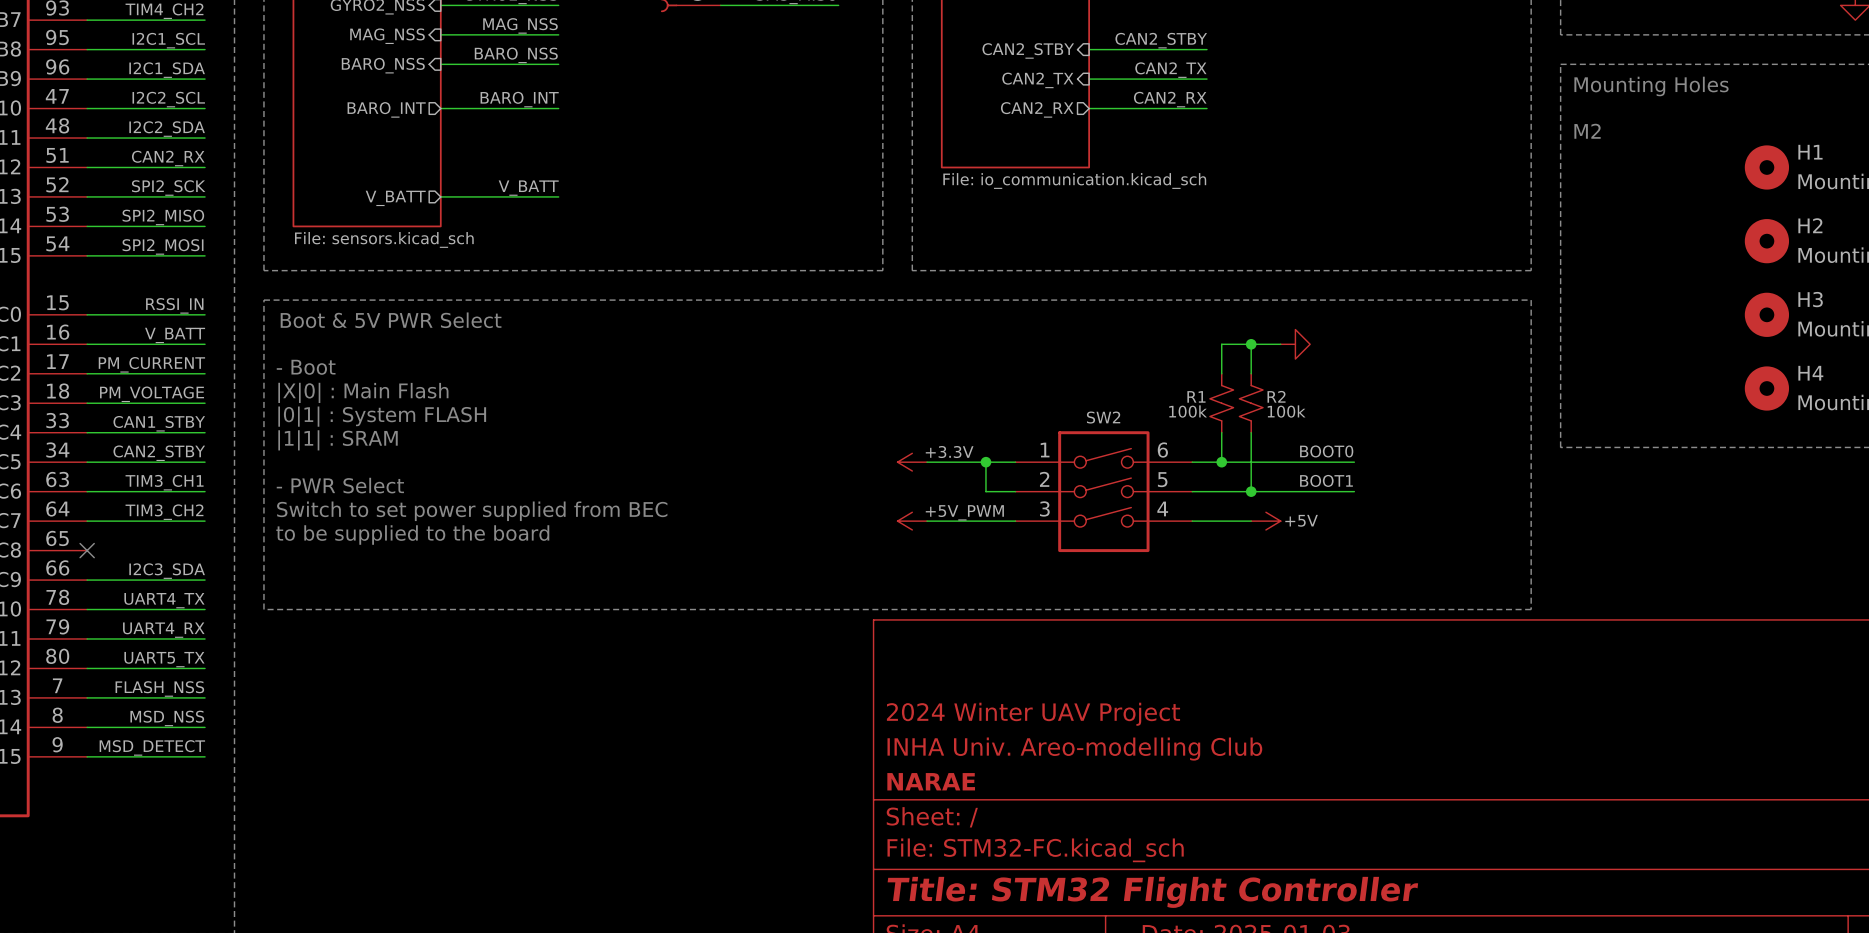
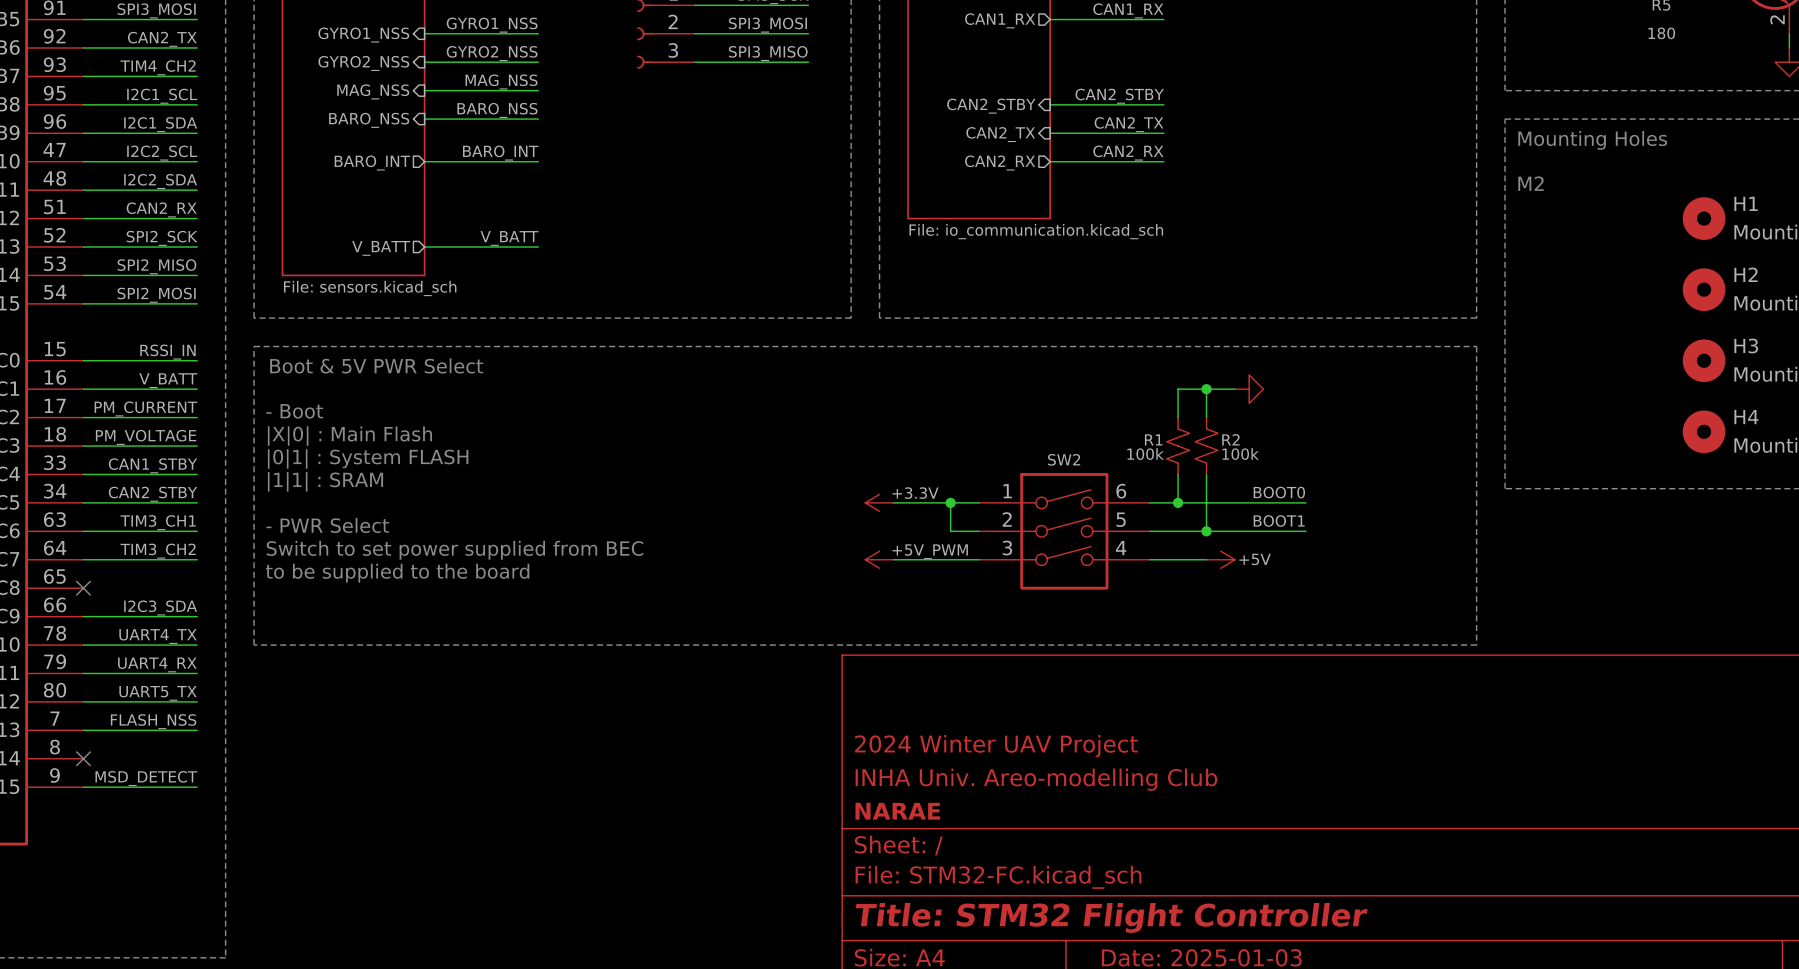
label: MSD_NSS (167, 718) -> none
wire: (87, 727) (205, 727) -> none
no-connect mark: none -> (83, 758)

